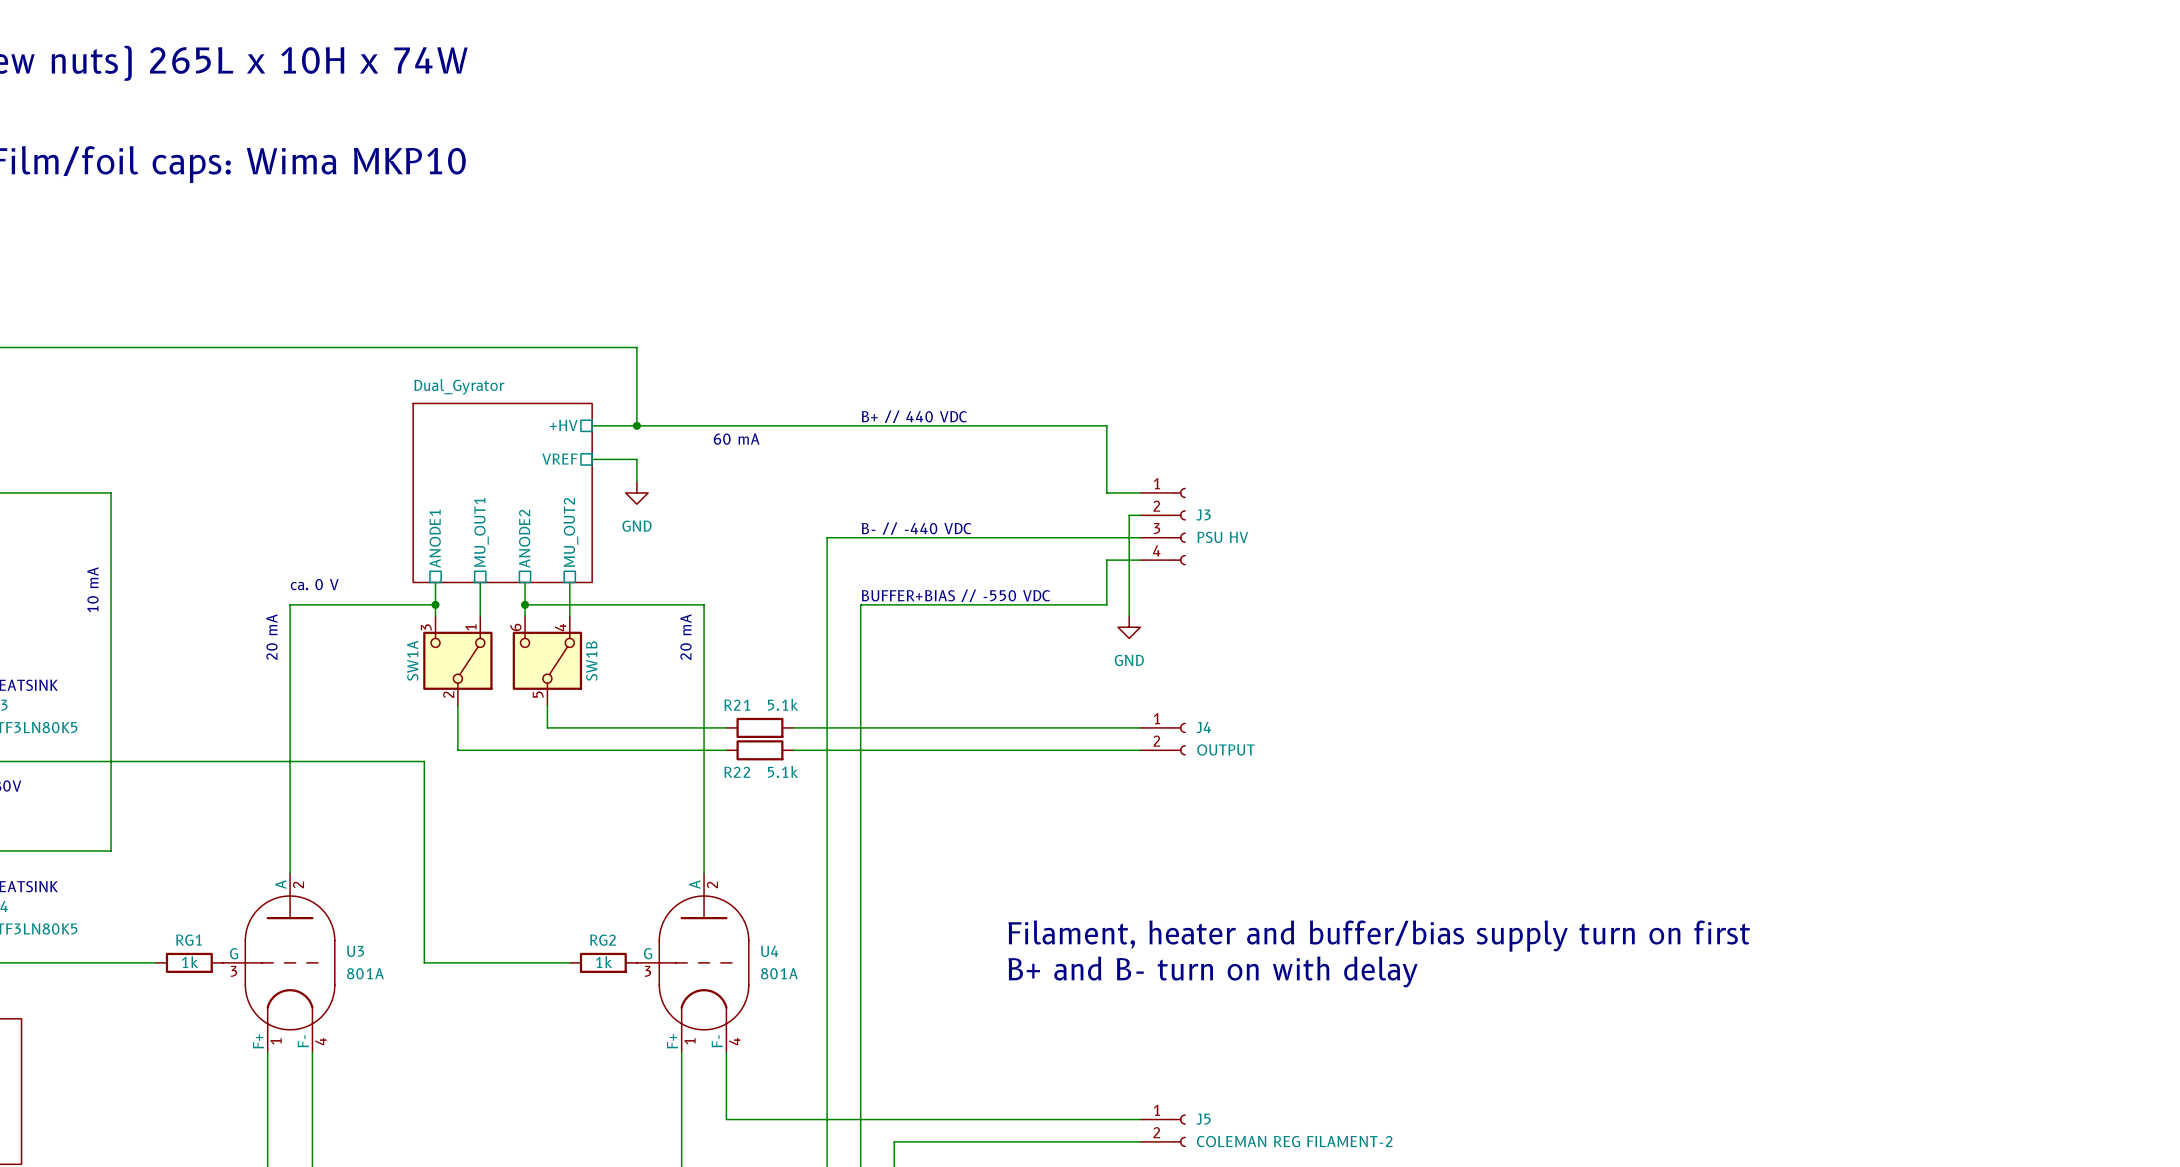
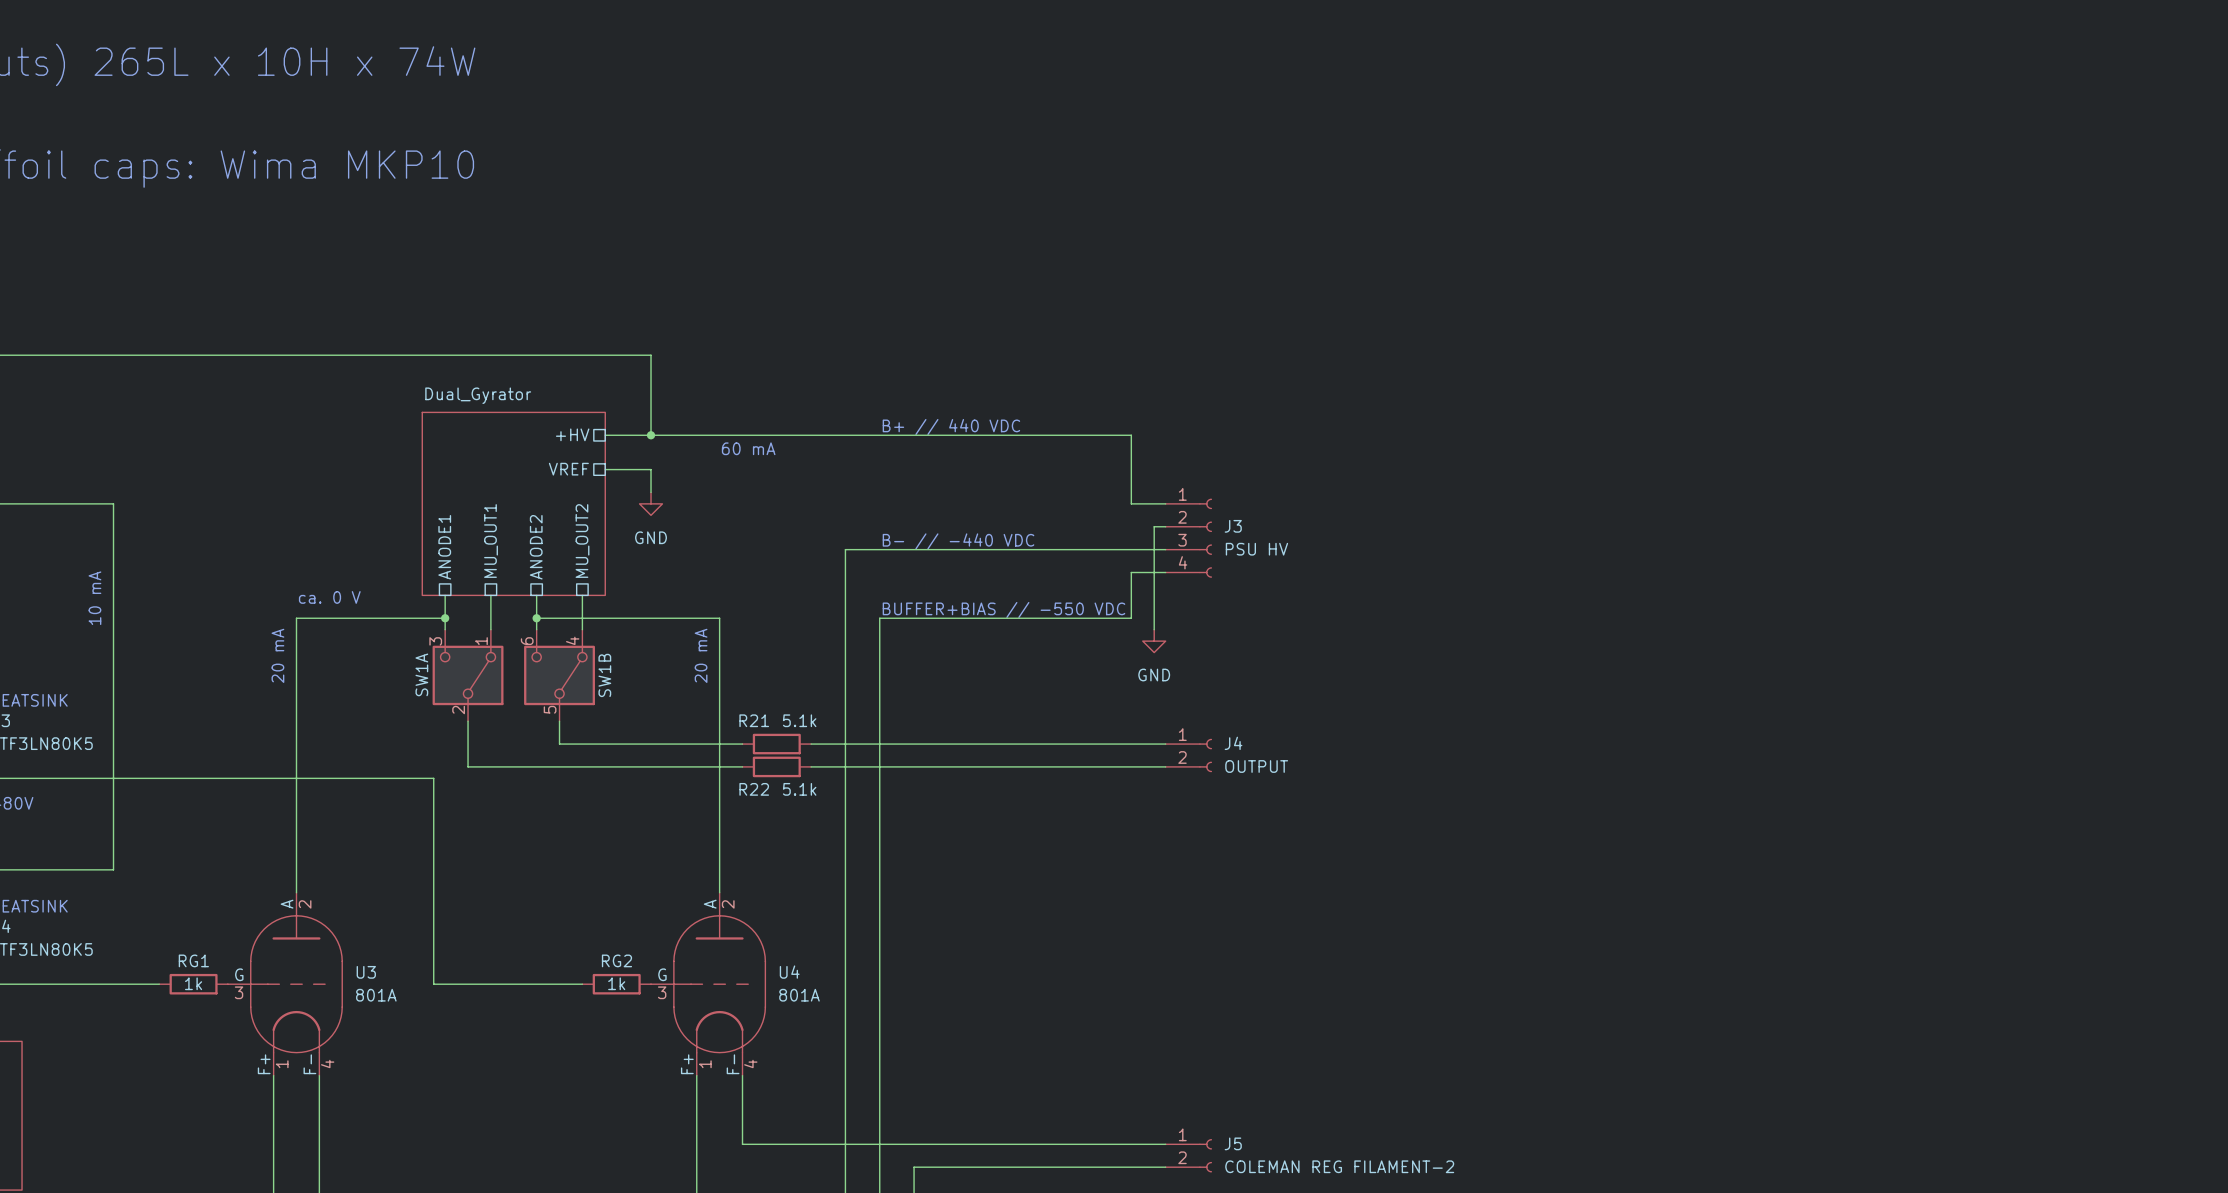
text: Filament, heater and buffer/bias supply turn on first (1379, 936) -> none
text: B+ and B- turn on with delay (1213, 971) -> none

